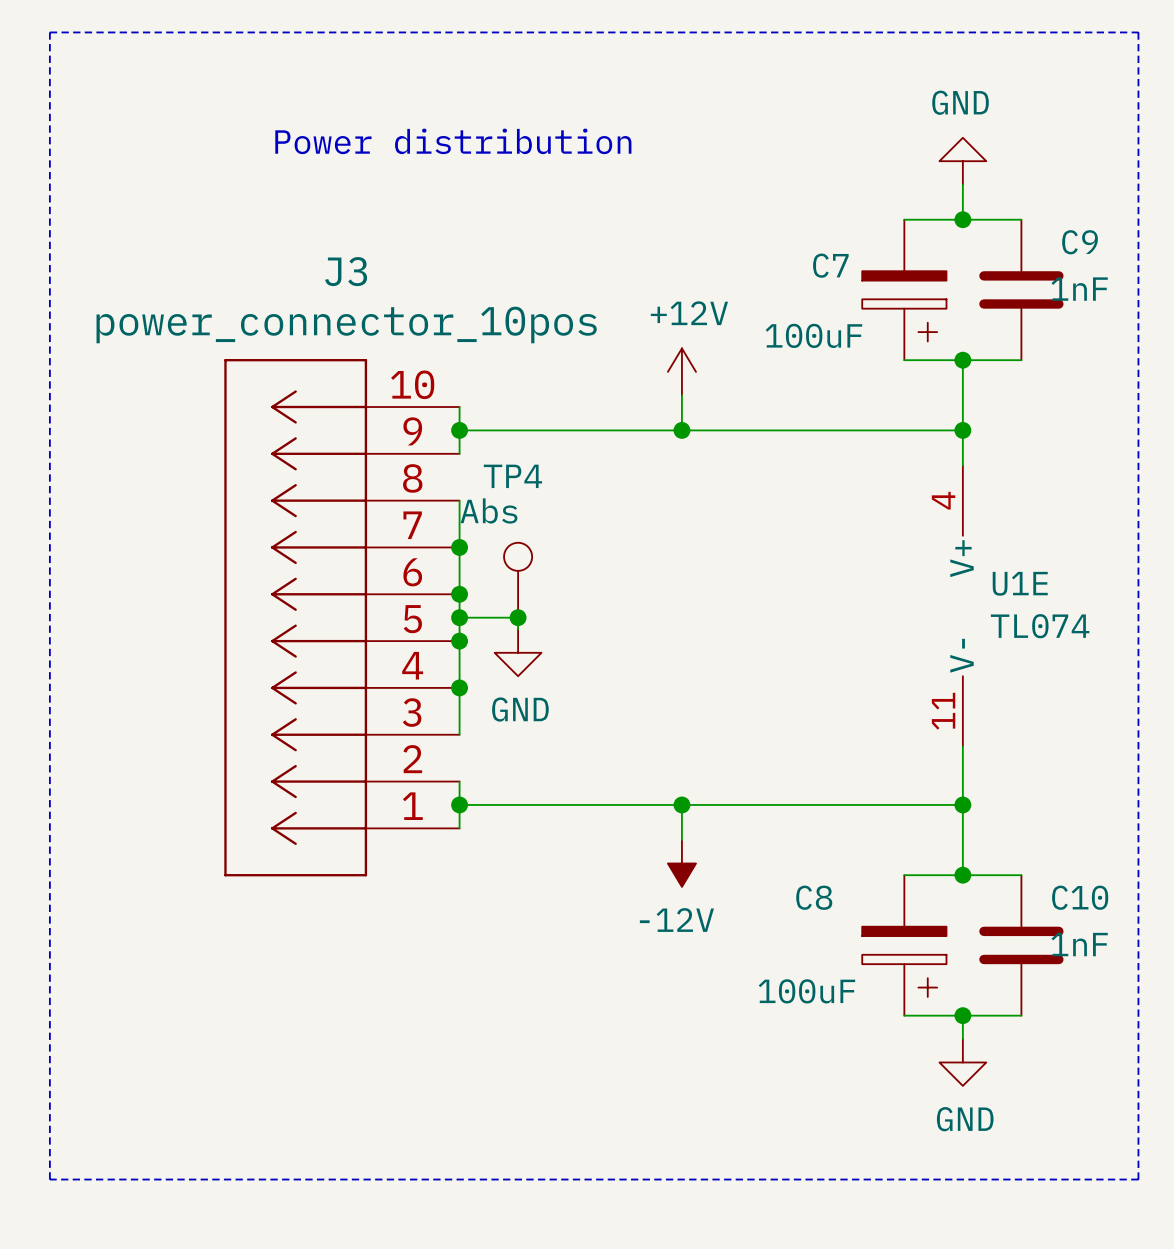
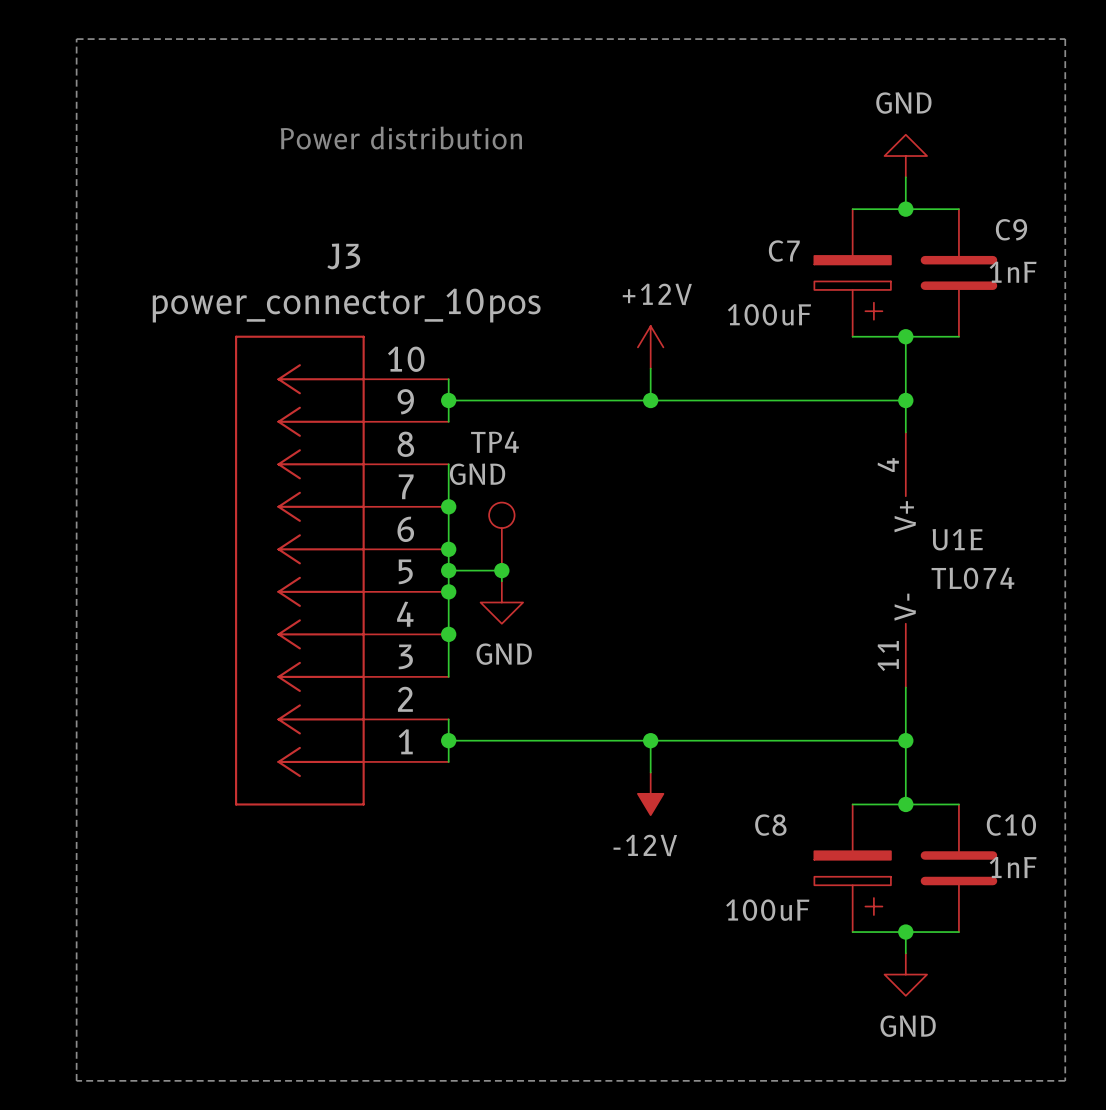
TP4 value: Abs (488, 510) -> GND (477, 474)

